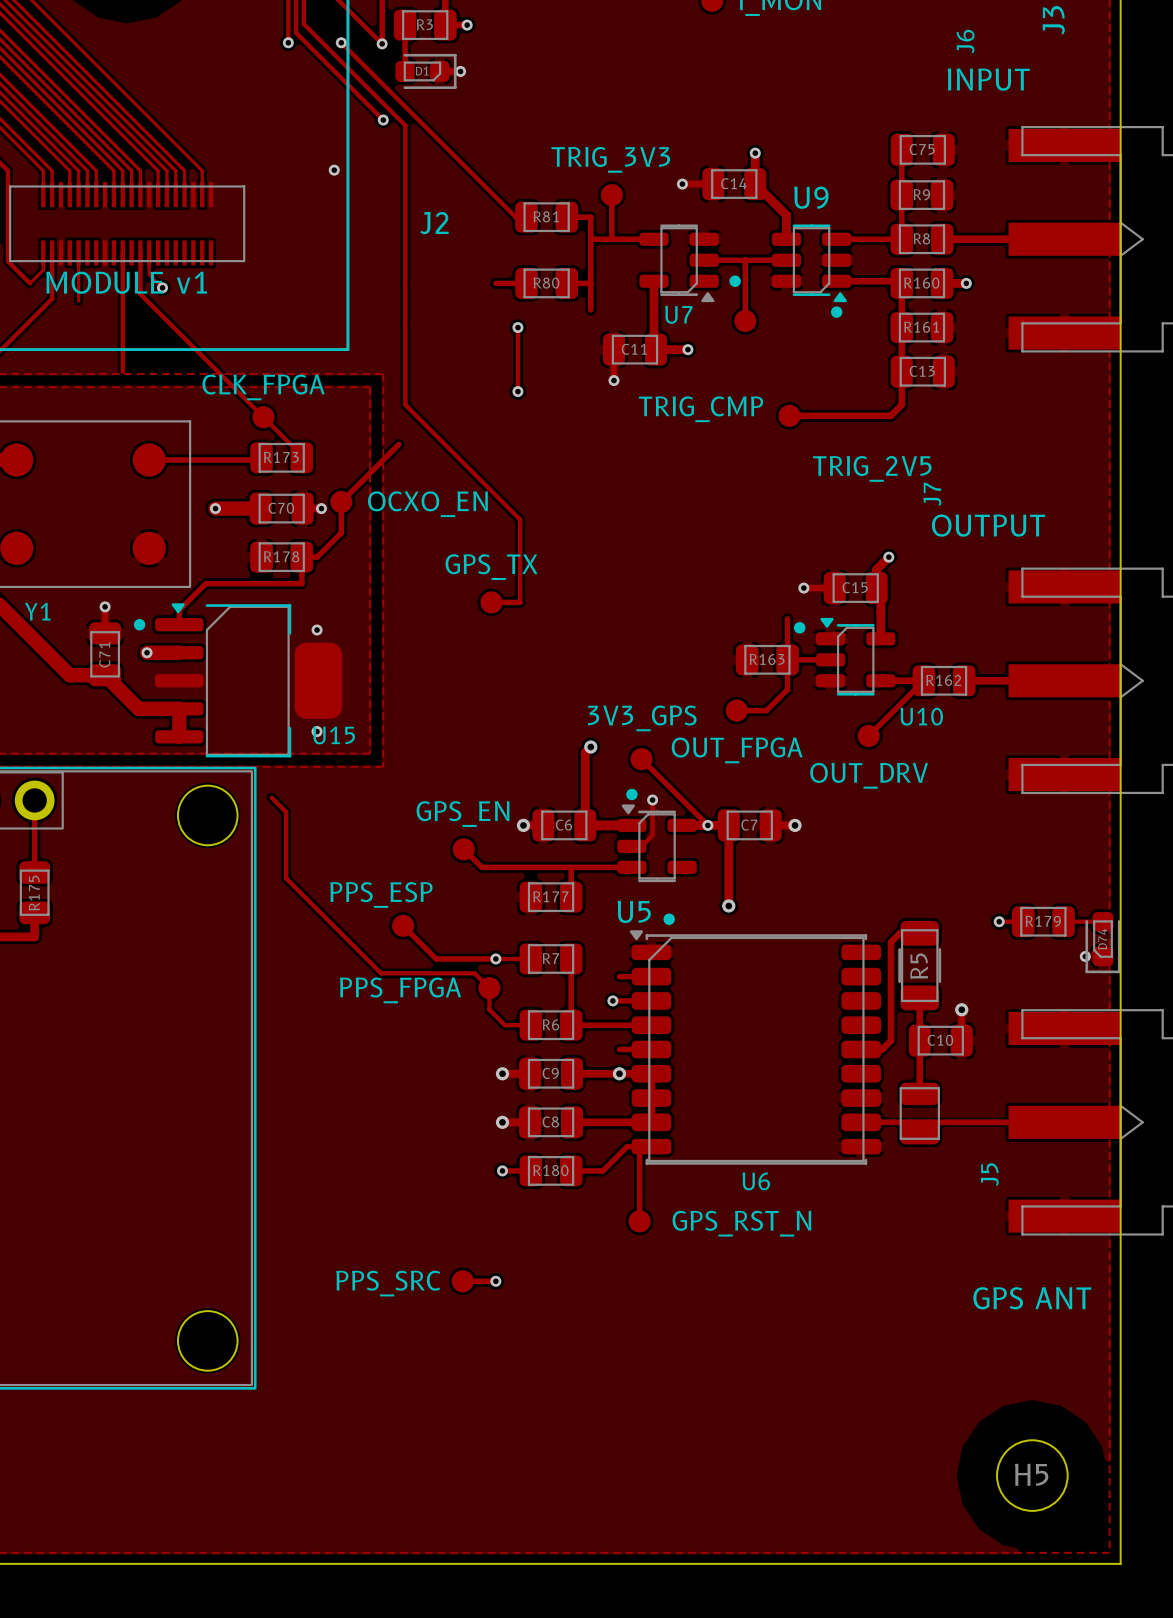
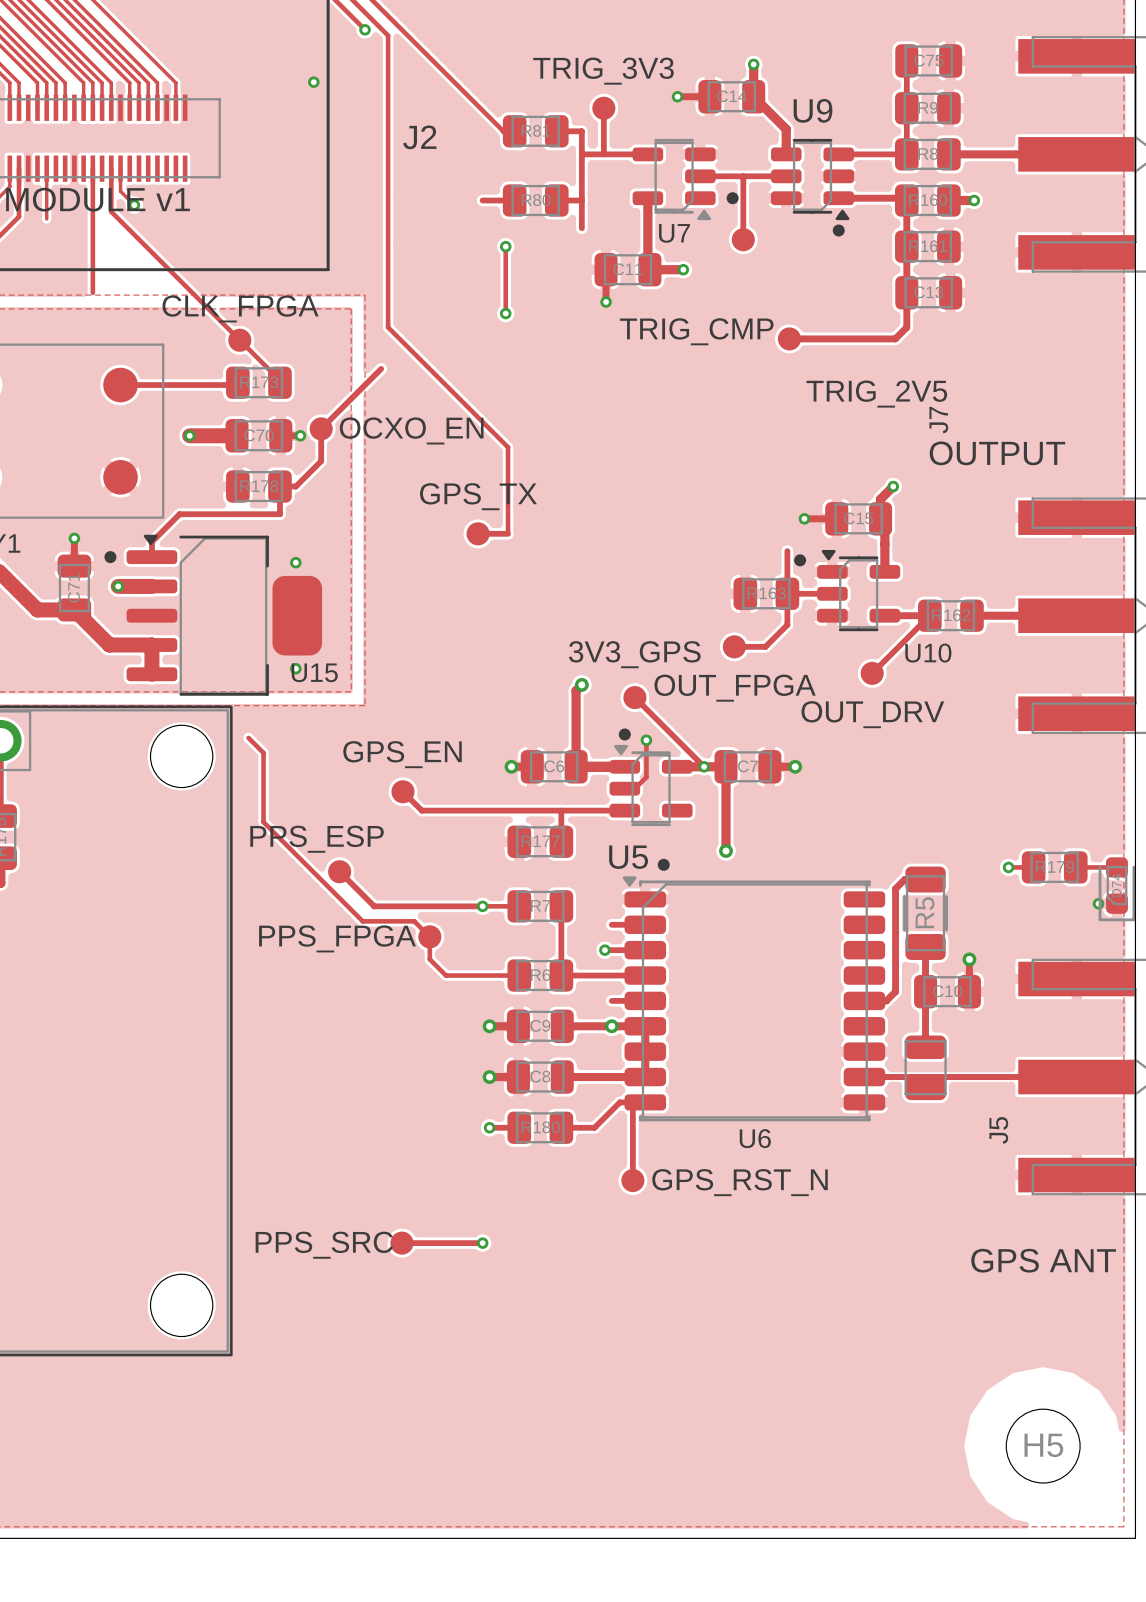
track: (463, 849) (481, 867) -> (402, 791) (421, 810) (467, 810)
part position: (463, 849) -> (402, 791)
track: (403, 925) (436, 958) -> (339, 871) (374, 906) (420, 906)
part position: (403, 925) -> (339, 871)
track: (430, 973) (474, 973) (489, 988) (489, 1009) (504, 1025) -> (414, 921) (429, 936) (429, 959) (445, 975) (492, 975)
part position: (489, 988) -> (429, 936)
track: none -> (401, 1243) (448, 1243)
part position: (462, 1281) -> (401, 1243)

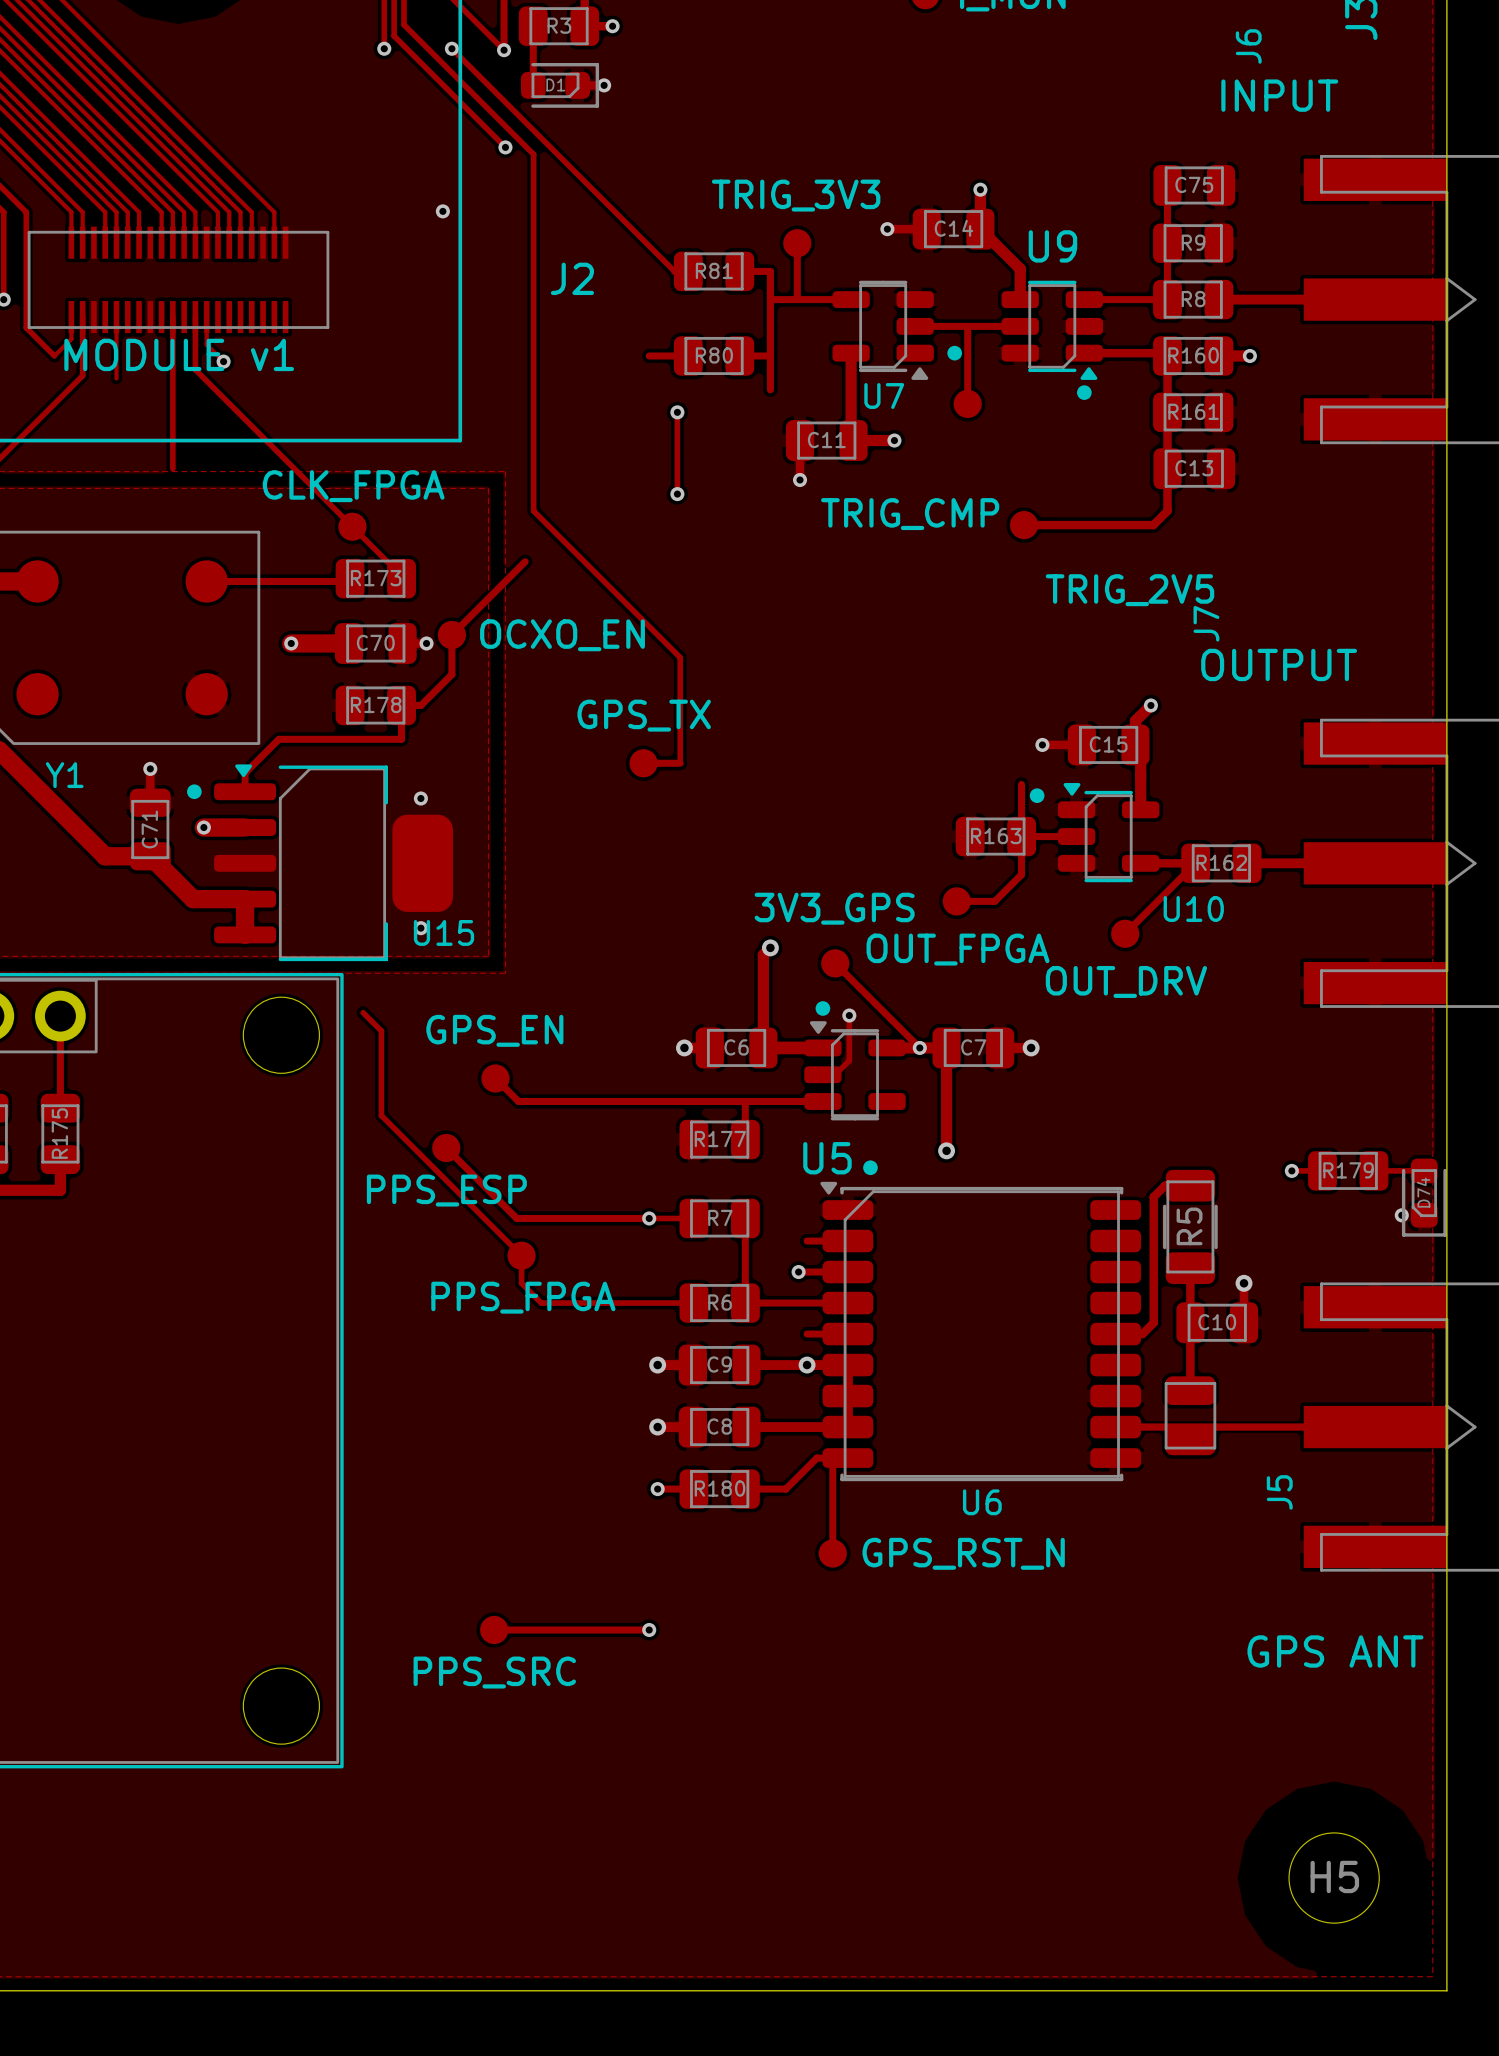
track: (402, 791) (421, 810) -> (495, 1078) (518, 1101) (574, 1101)
part position: (402, 791) -> (495, 1078)
part value position: PPS_ESP (317, 839) -> PPS_ESP (446, 1190)
track: none -> (446, 1148) (474, 1176)
part position: (339, 871) -> (446, 1148)
track: (362, 921) (414, 921) (429, 936) (429, 959) (445, 975) -> (502, 1236) (521, 1255) (521, 1283) (541, 1303) (604, 1303)
part position: (429, 936) -> (521, 1255)
part value position: PPS_FPGA (337, 938) -> PPS_FPGA (523, 1297)
track: none -> (494, 1630) (550, 1630)
part position: (401, 1243) -> (494, 1630)
part value position: PPS_SRC (324, 1245) -> PPS_SRC (494, 1672)

